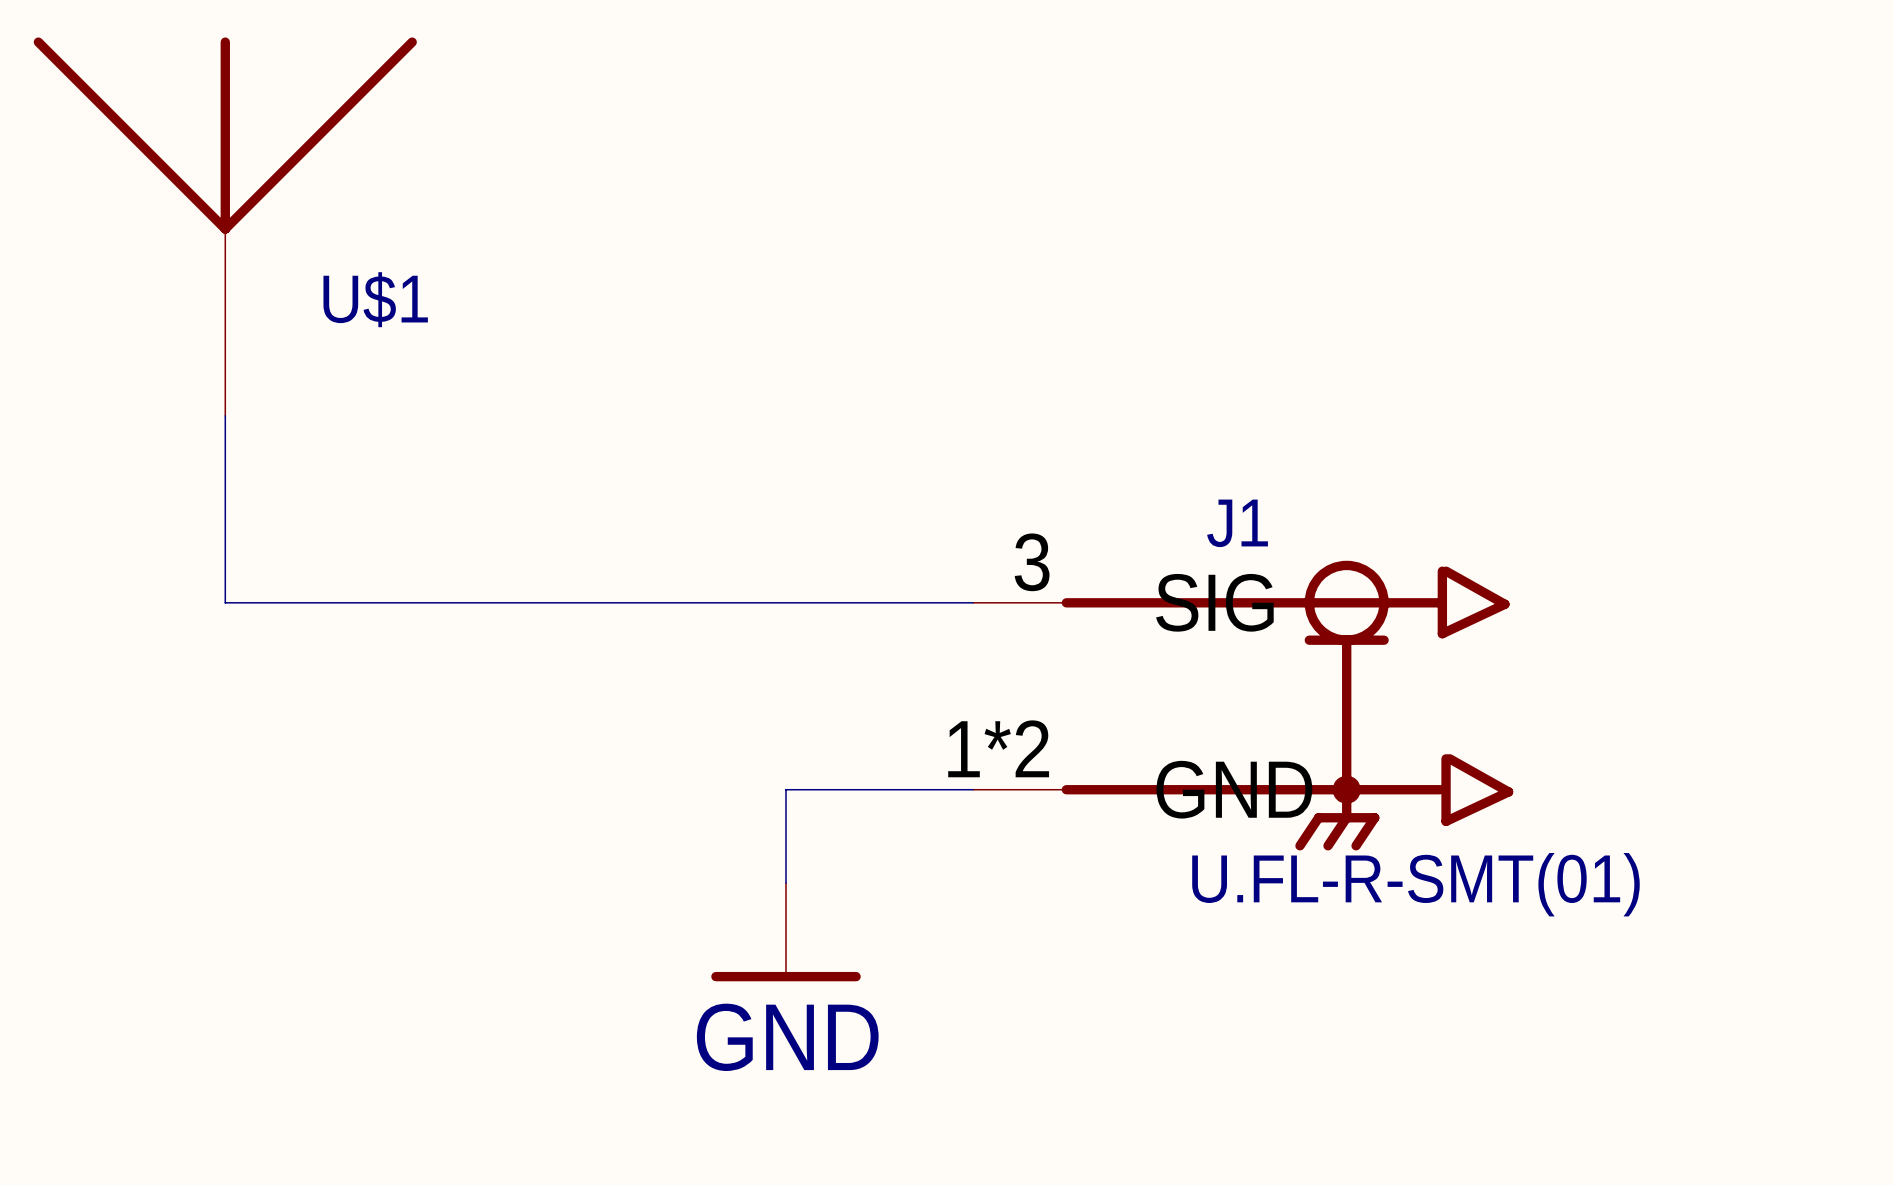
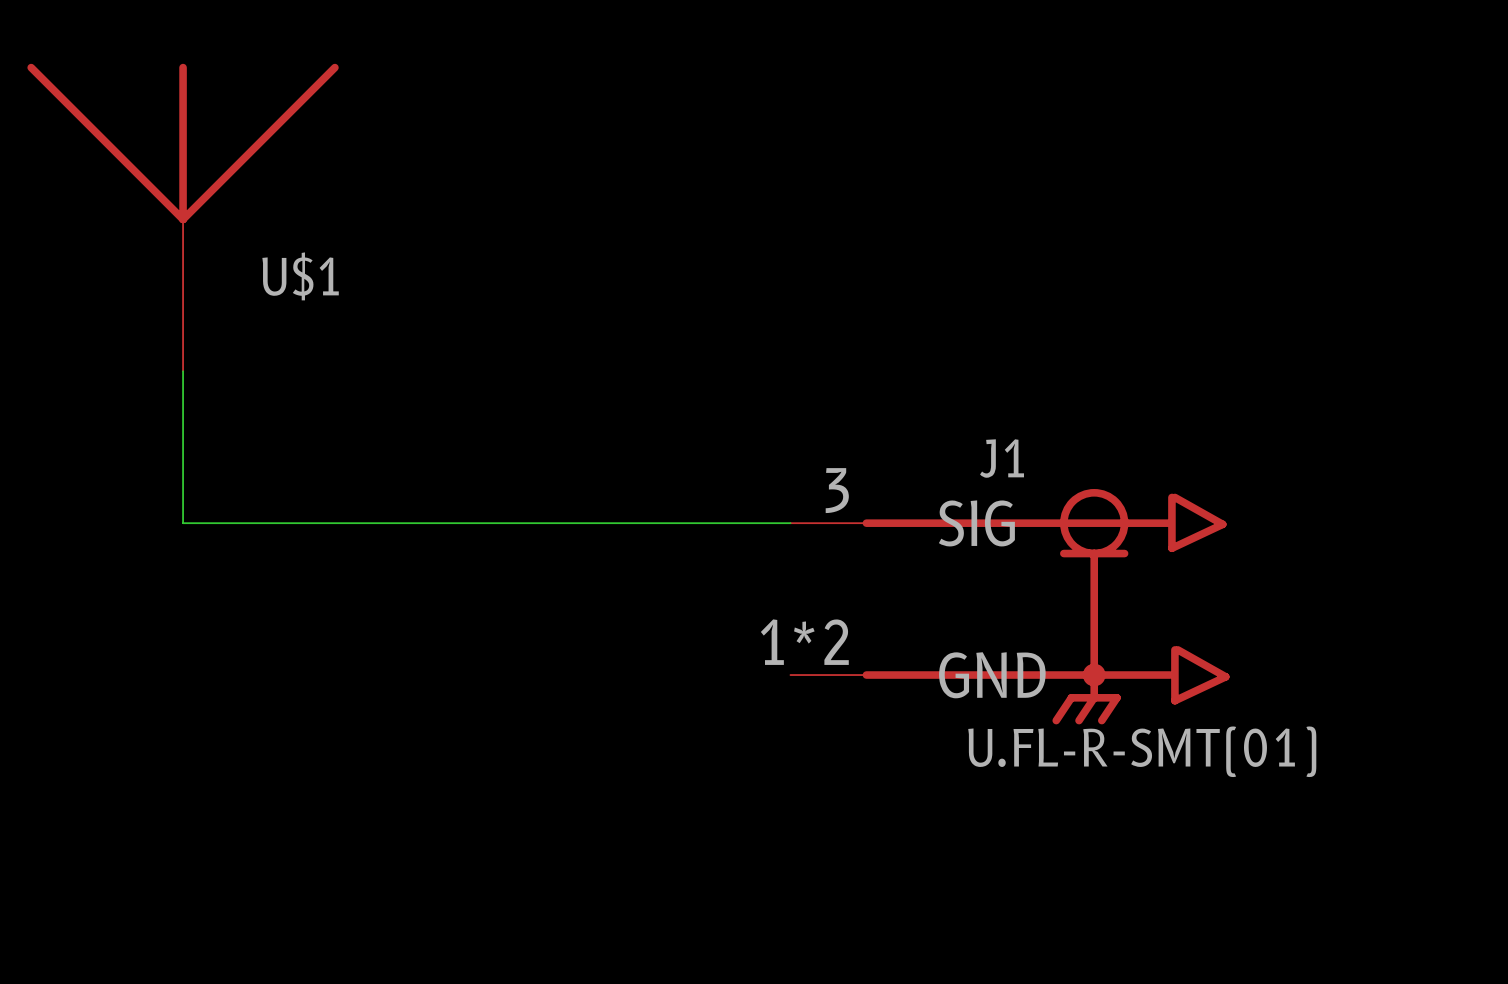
wire: (972, 789) (786, 789) (786, 883) -> none
power symbol: GND (786, 932) -> none

